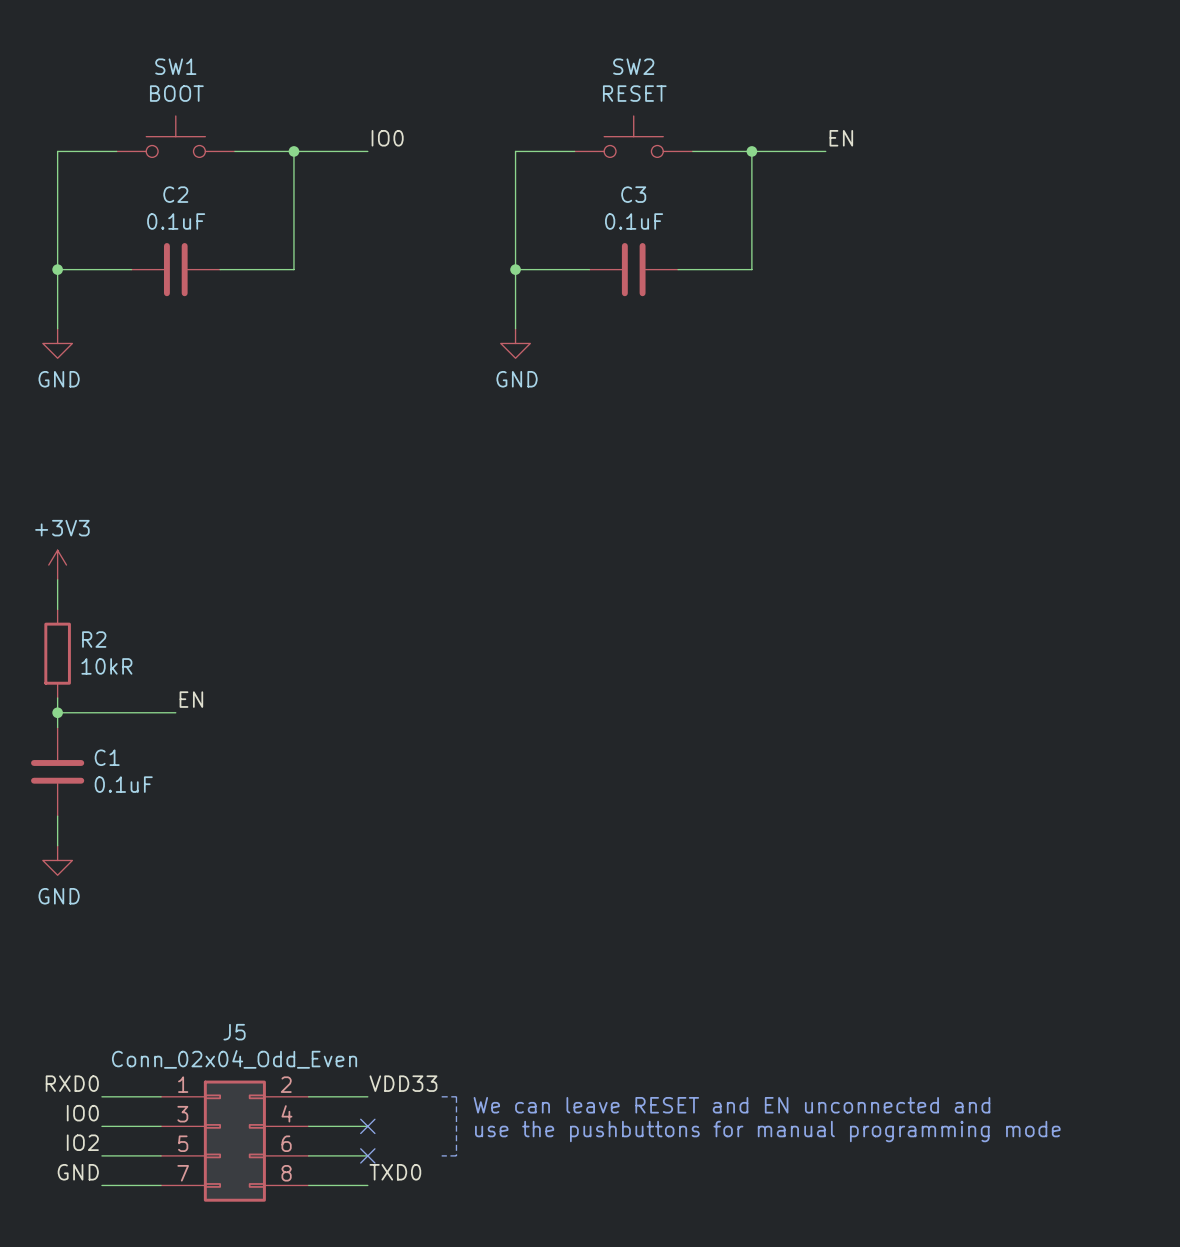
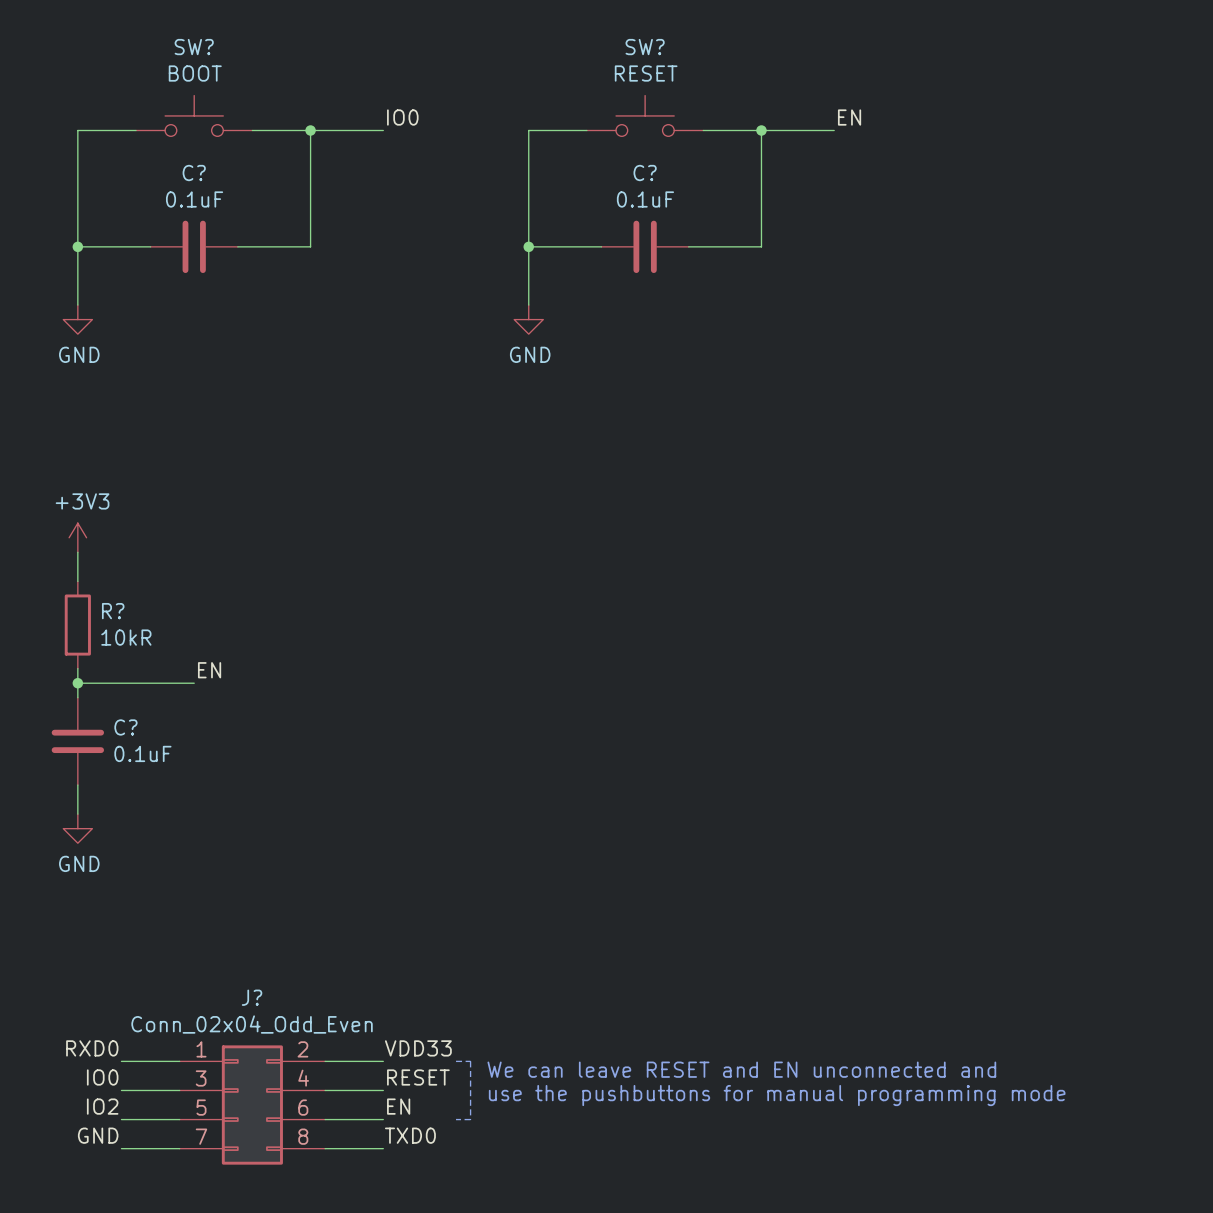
SW1 name: SW1 (175, 66) -> SW? (194, 47)
SW2 name: SW2 (633, 66) -> SW? (645, 47)
C2 name: C2 (175, 194) -> C? (194, 173)
C3 name: C3 (633, 194) -> C? (645, 173)
R2 name: R2 (94, 639) -> R? (113, 611)
C1 name: C1 (107, 757) -> C? (125, 727)
J5 name: J5 (234, 1032) -> J? (252, 997)
label: none -> RESET (418, 1077)
no-connect mark: (367, 1126) -> none
label: none -> EN (398, 1106)
no-connect mark: (367, 1155) -> none

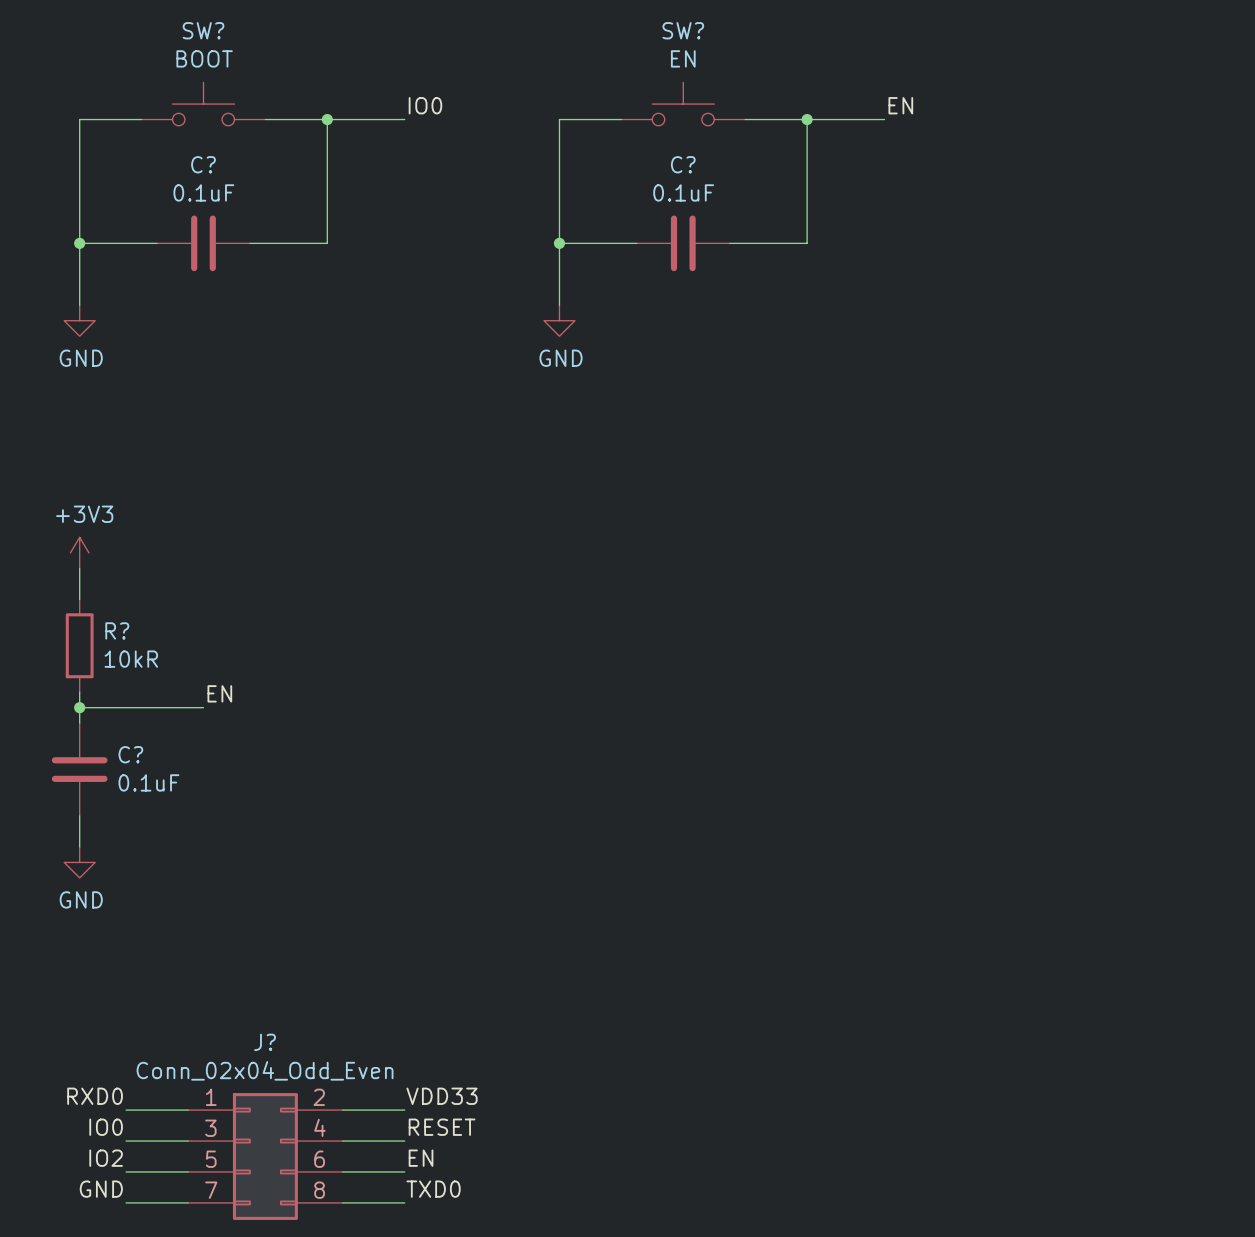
SW? value: RESET (646, 73) -> EN (683, 58)
line: (456, 1061) (470, 1061) (470, 1119) (456, 1119) -> none
text: We can leave RESET and EN unconnected and (741, 1069) -> none
text: use the pushbuttons for manual programming mode (777, 1095) -> none

